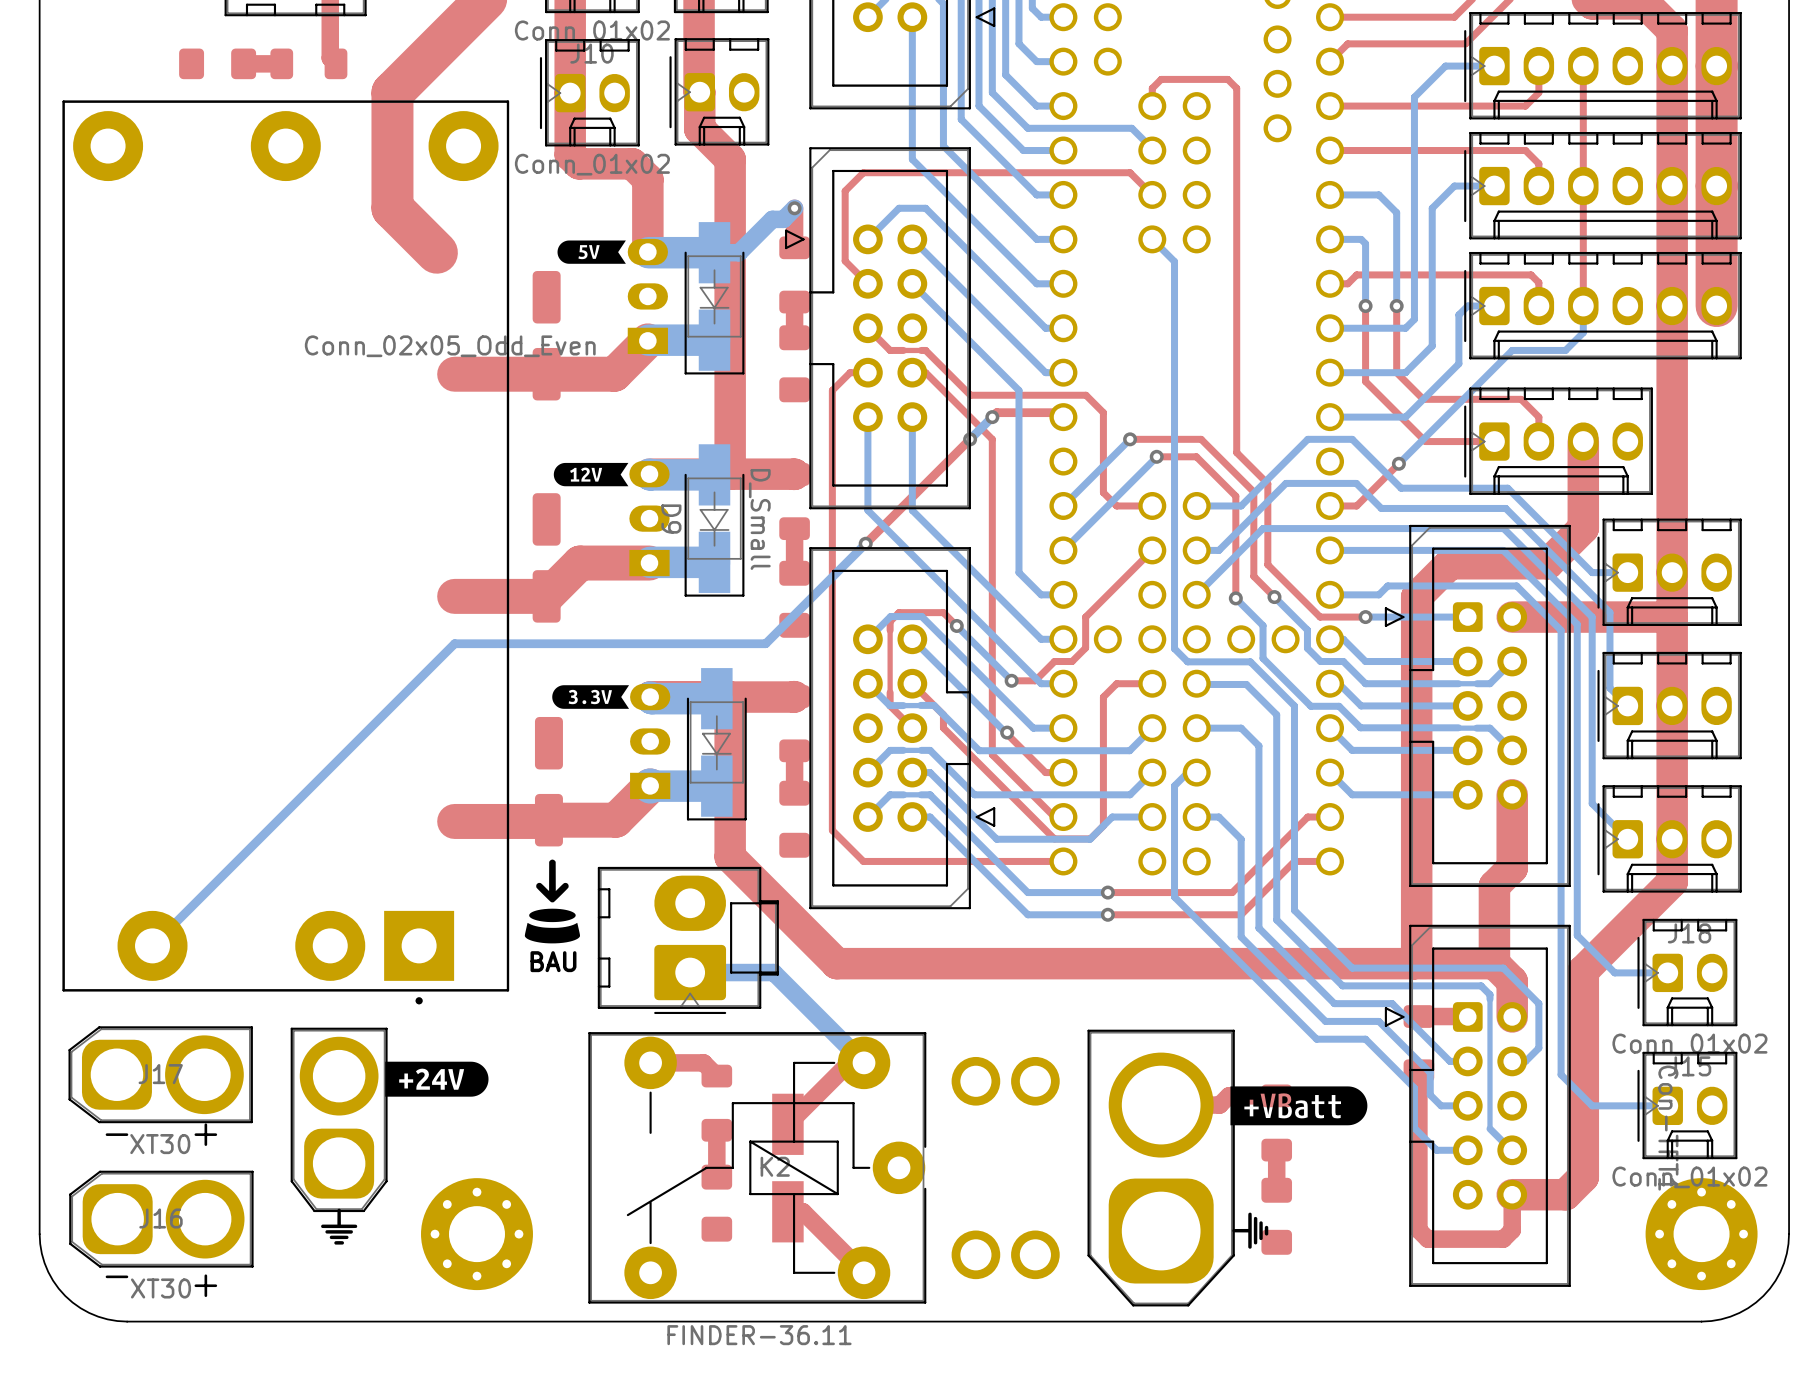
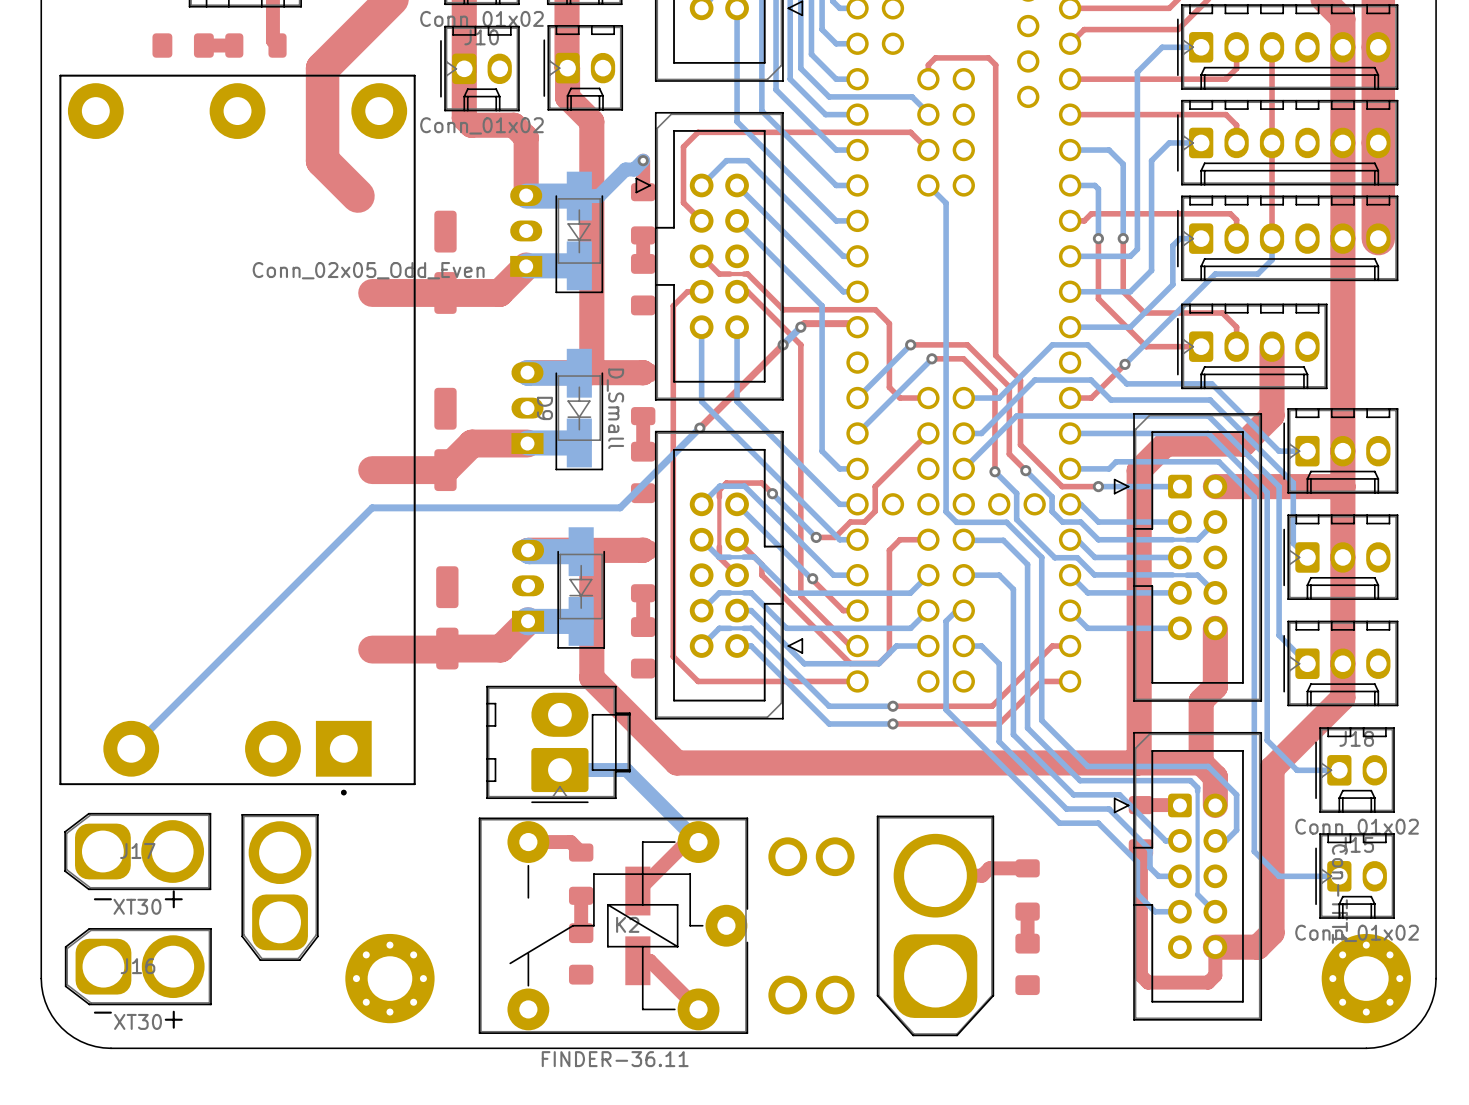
drawing: [557, 240, 626, 264] -> none
drawing: [553, 462, 629, 487] -> none
drawing: [552, 685, 630, 709] -> none
drawing: [524, 859, 581, 944] -> none
text: BAU (553, 961) -> none
drawing: [385, 1061, 489, 1097] -> none
drawing: [1230, 1086, 1368, 1126] -> none
drawing: [321, 1208, 358, 1245] -> none
drawing: [1232, 1212, 1269, 1249] -> none

